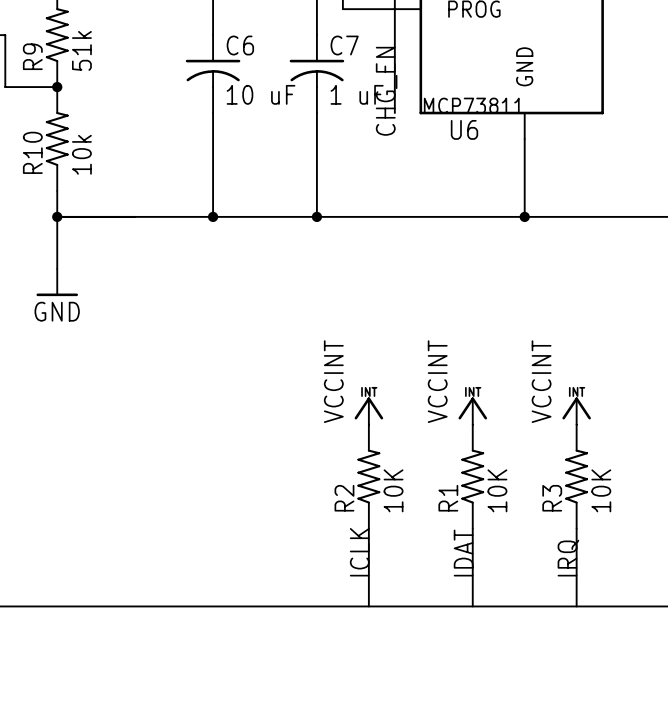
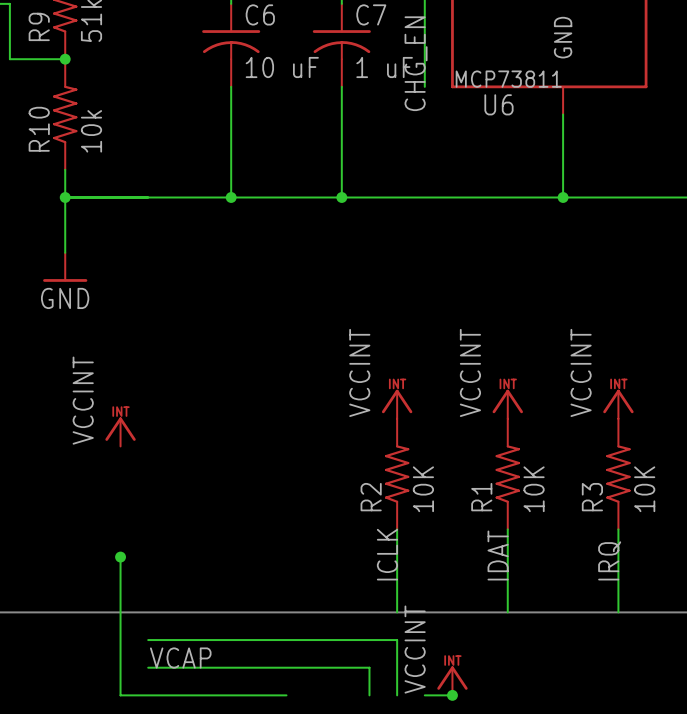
power symbol: none -> VCCINT (120, 431)
wire: none -> (120, 557) (120, 695) (286, 695)
junction: none -> (120, 557)
wire: none -> (148, 640) (397, 640) (397, 695)
label: none -> VCAP (180, 658)
wire: none -> (148, 667) (369, 667) (369, 695)
power symbol: none -> VCCINT (452, 680)
wire: none -> (424, 695) (452, 695)
junction: none -> (452, 695)

